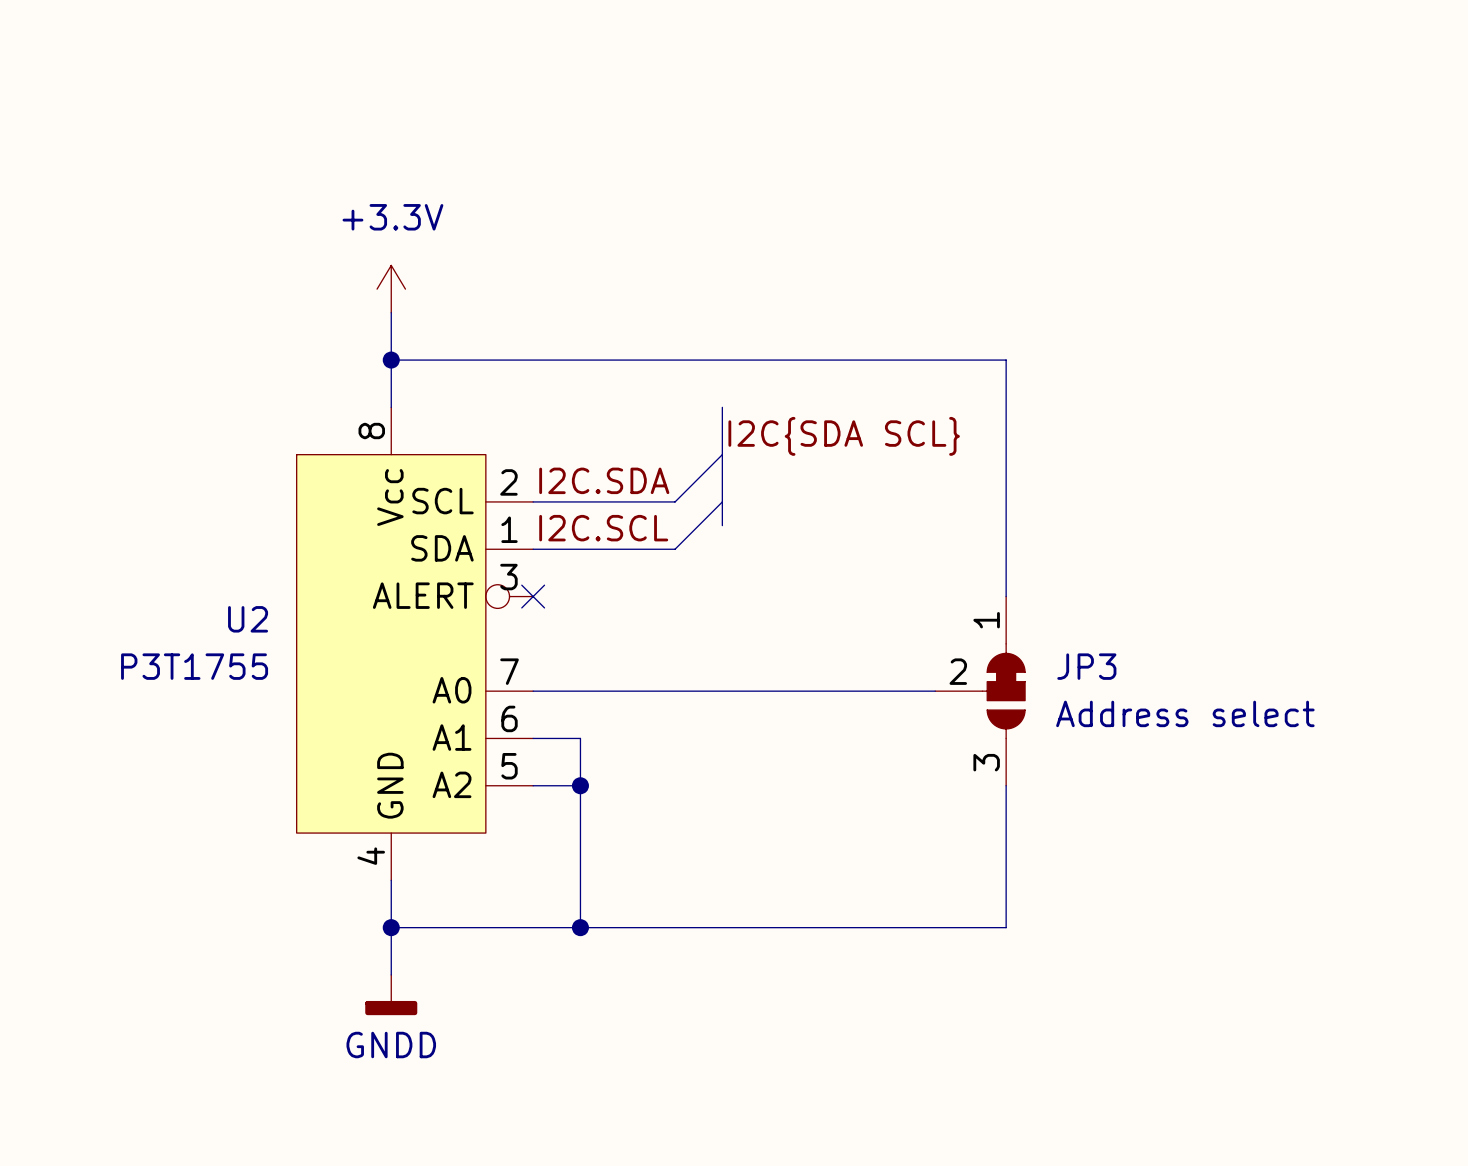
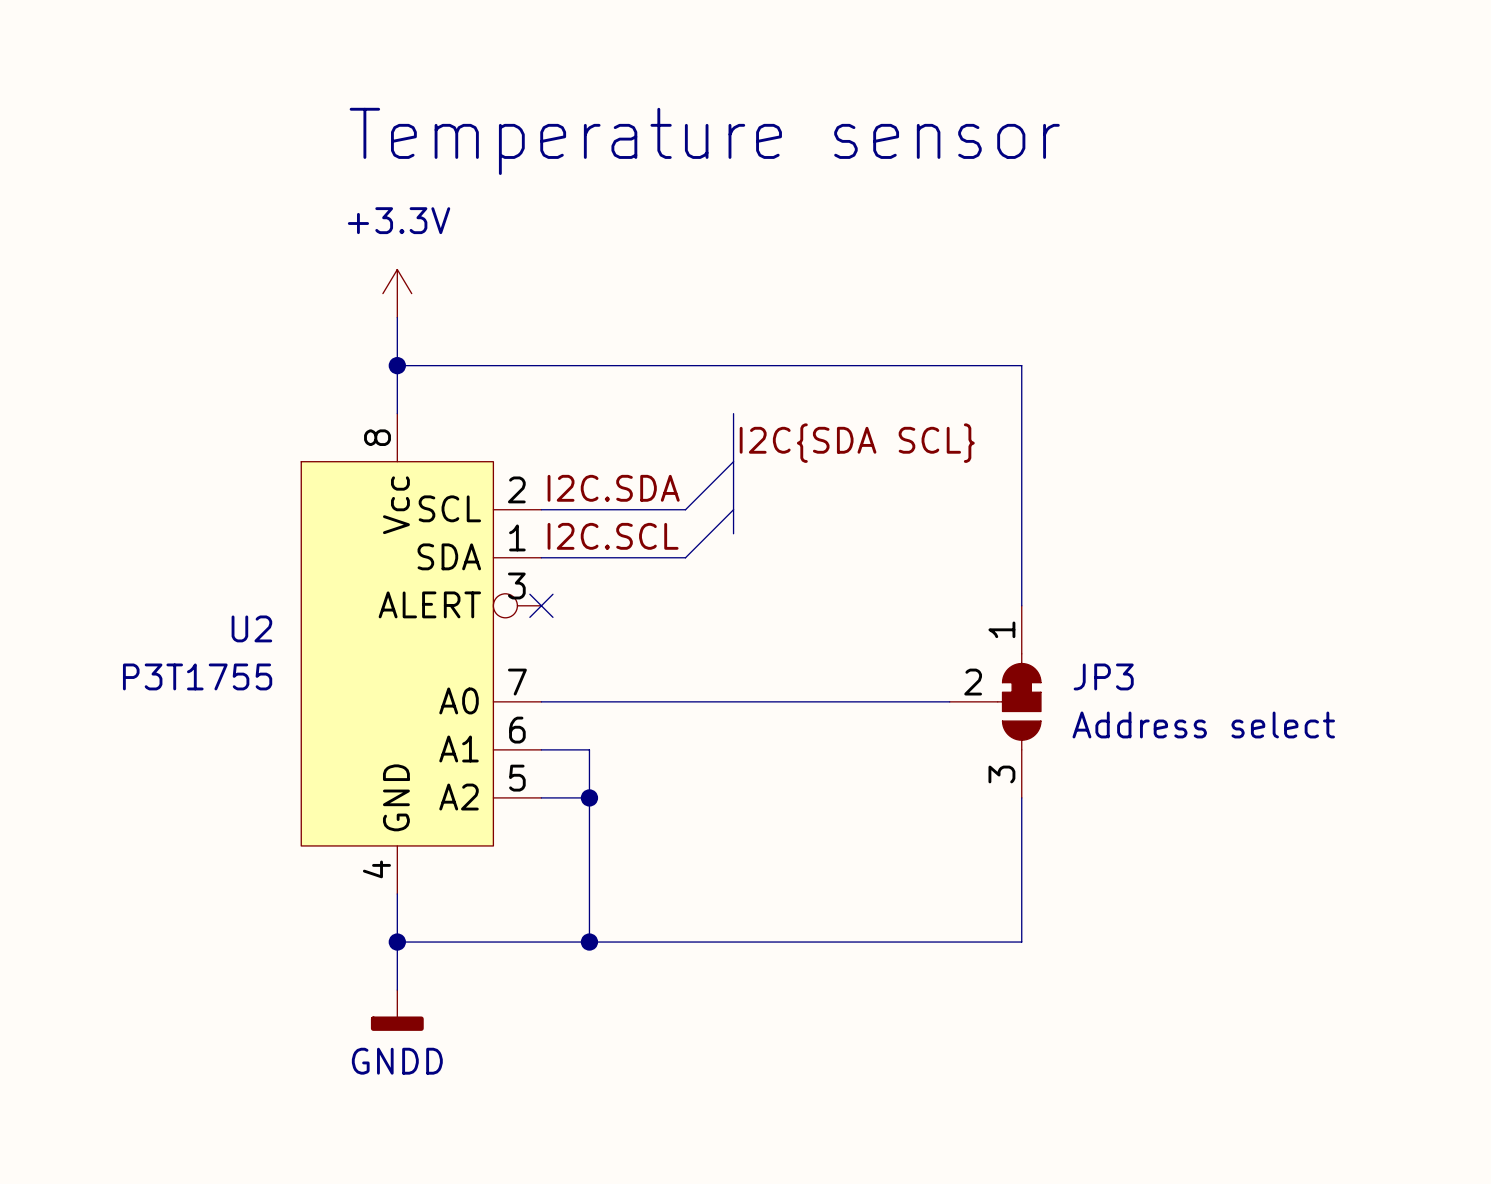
text: none -> Temperature sensor (704, 141)

